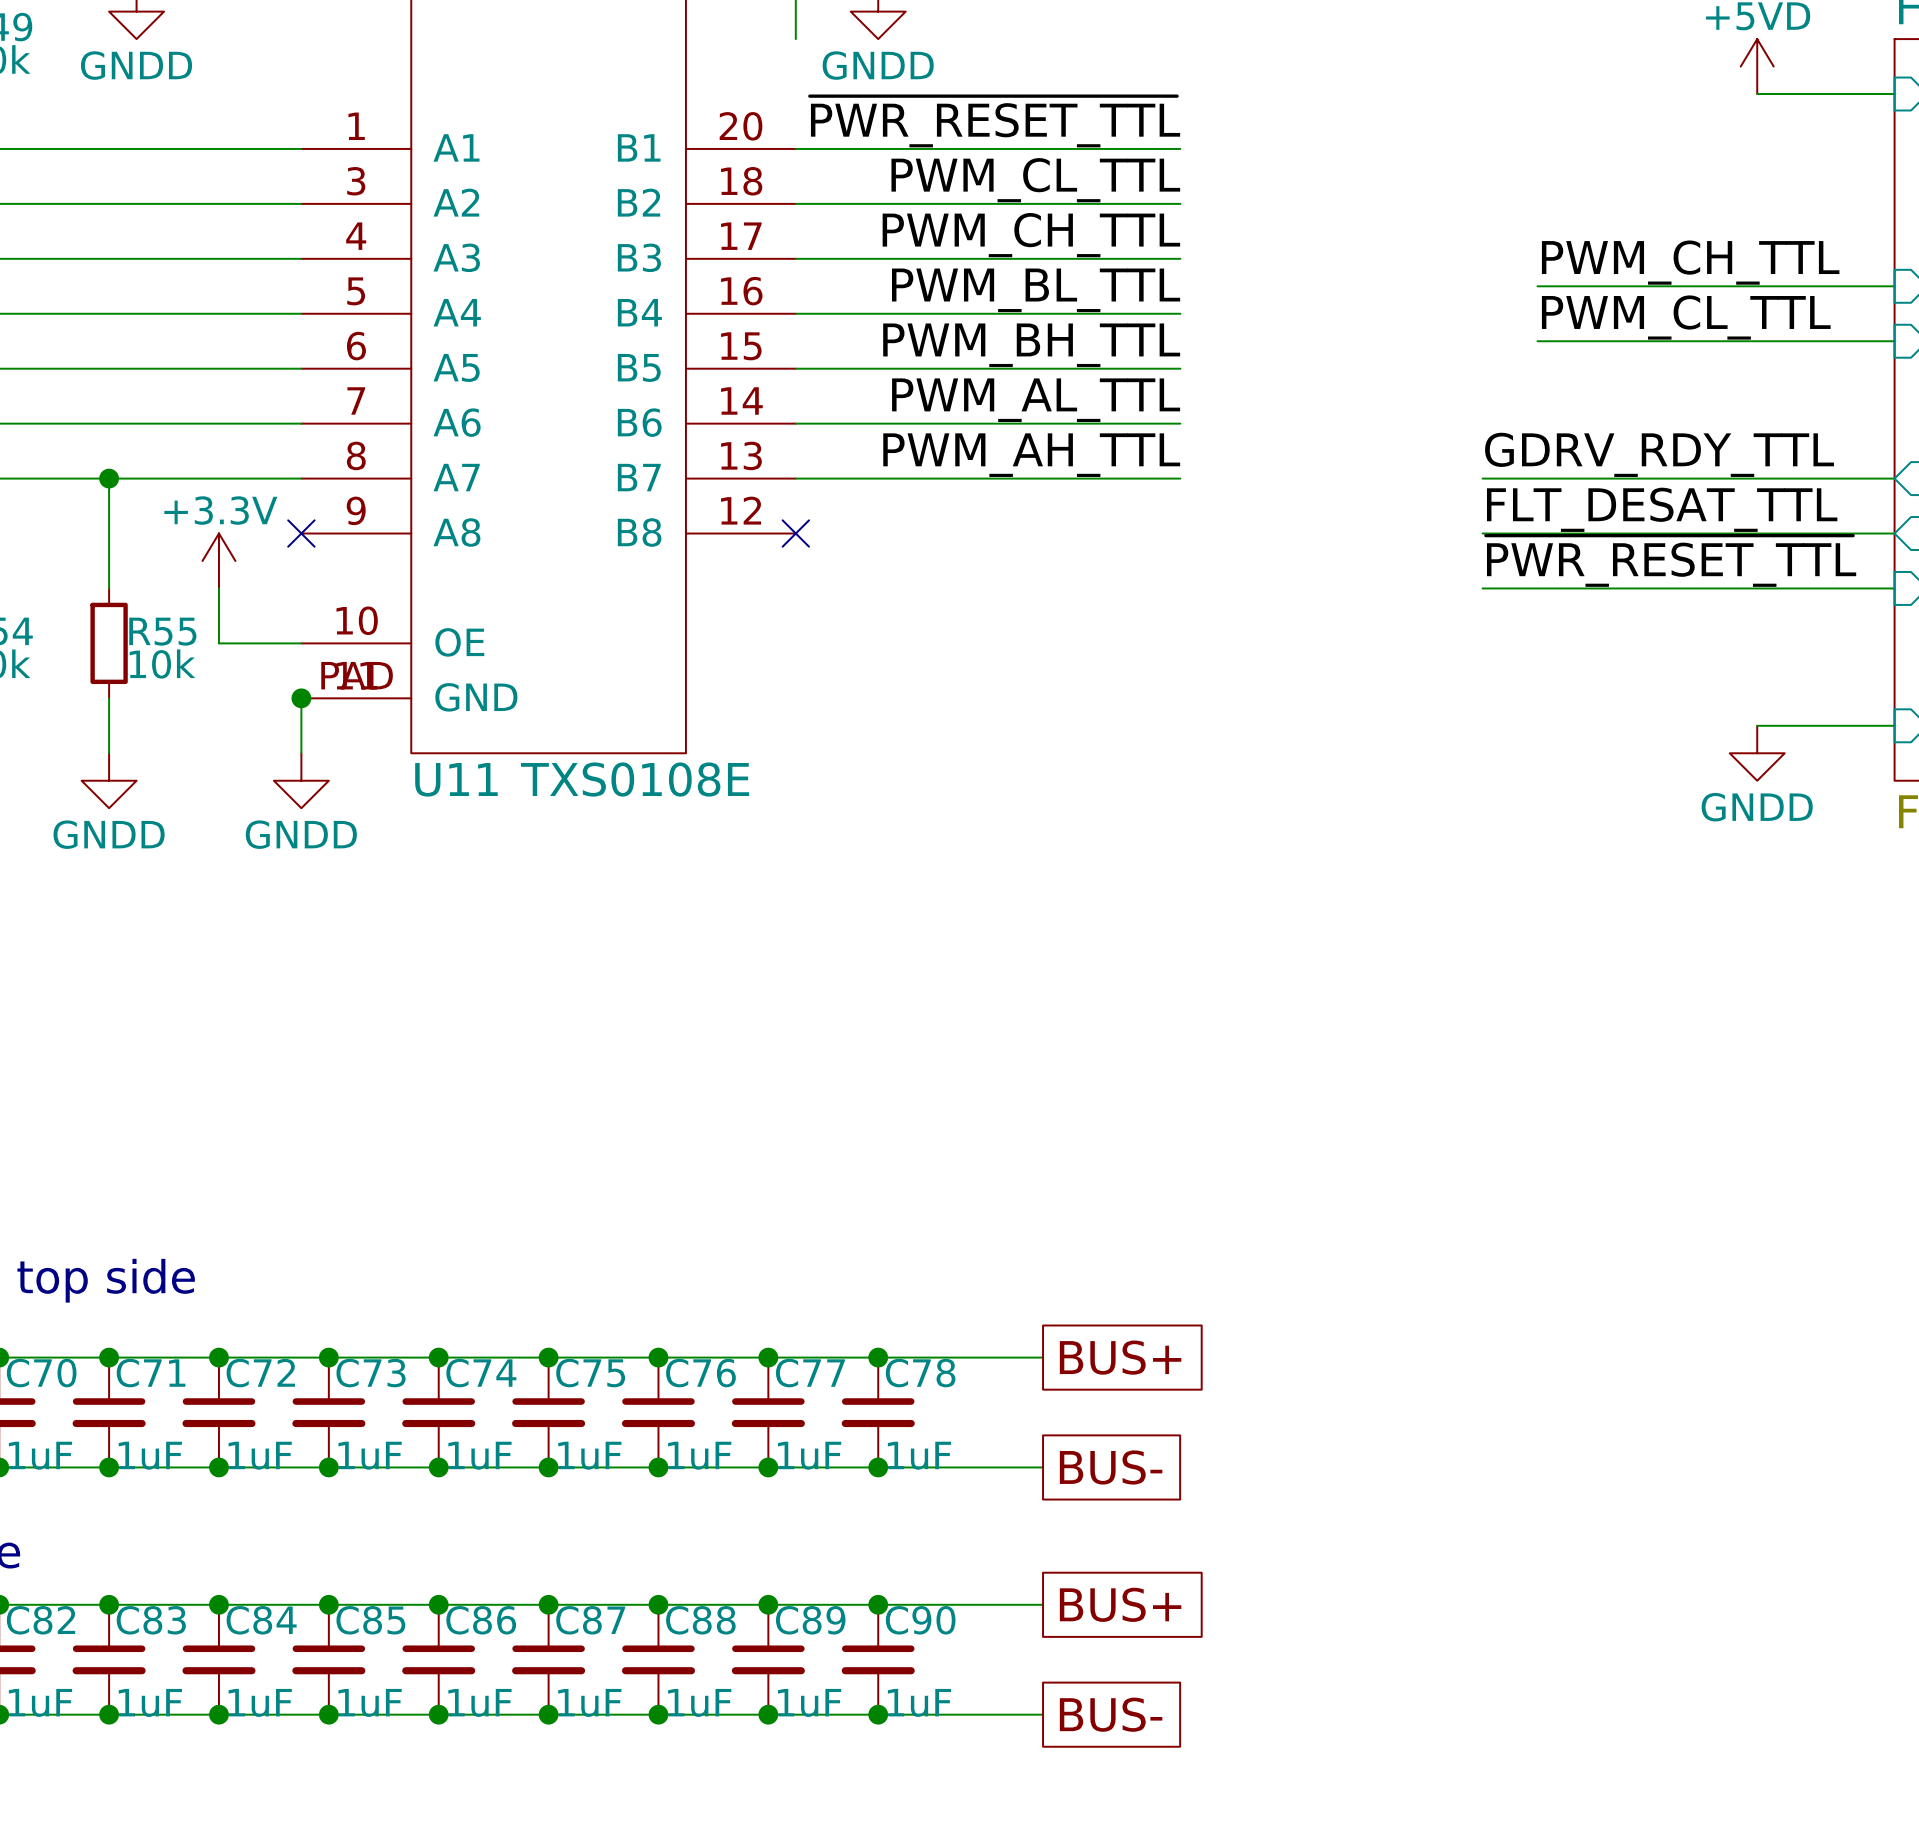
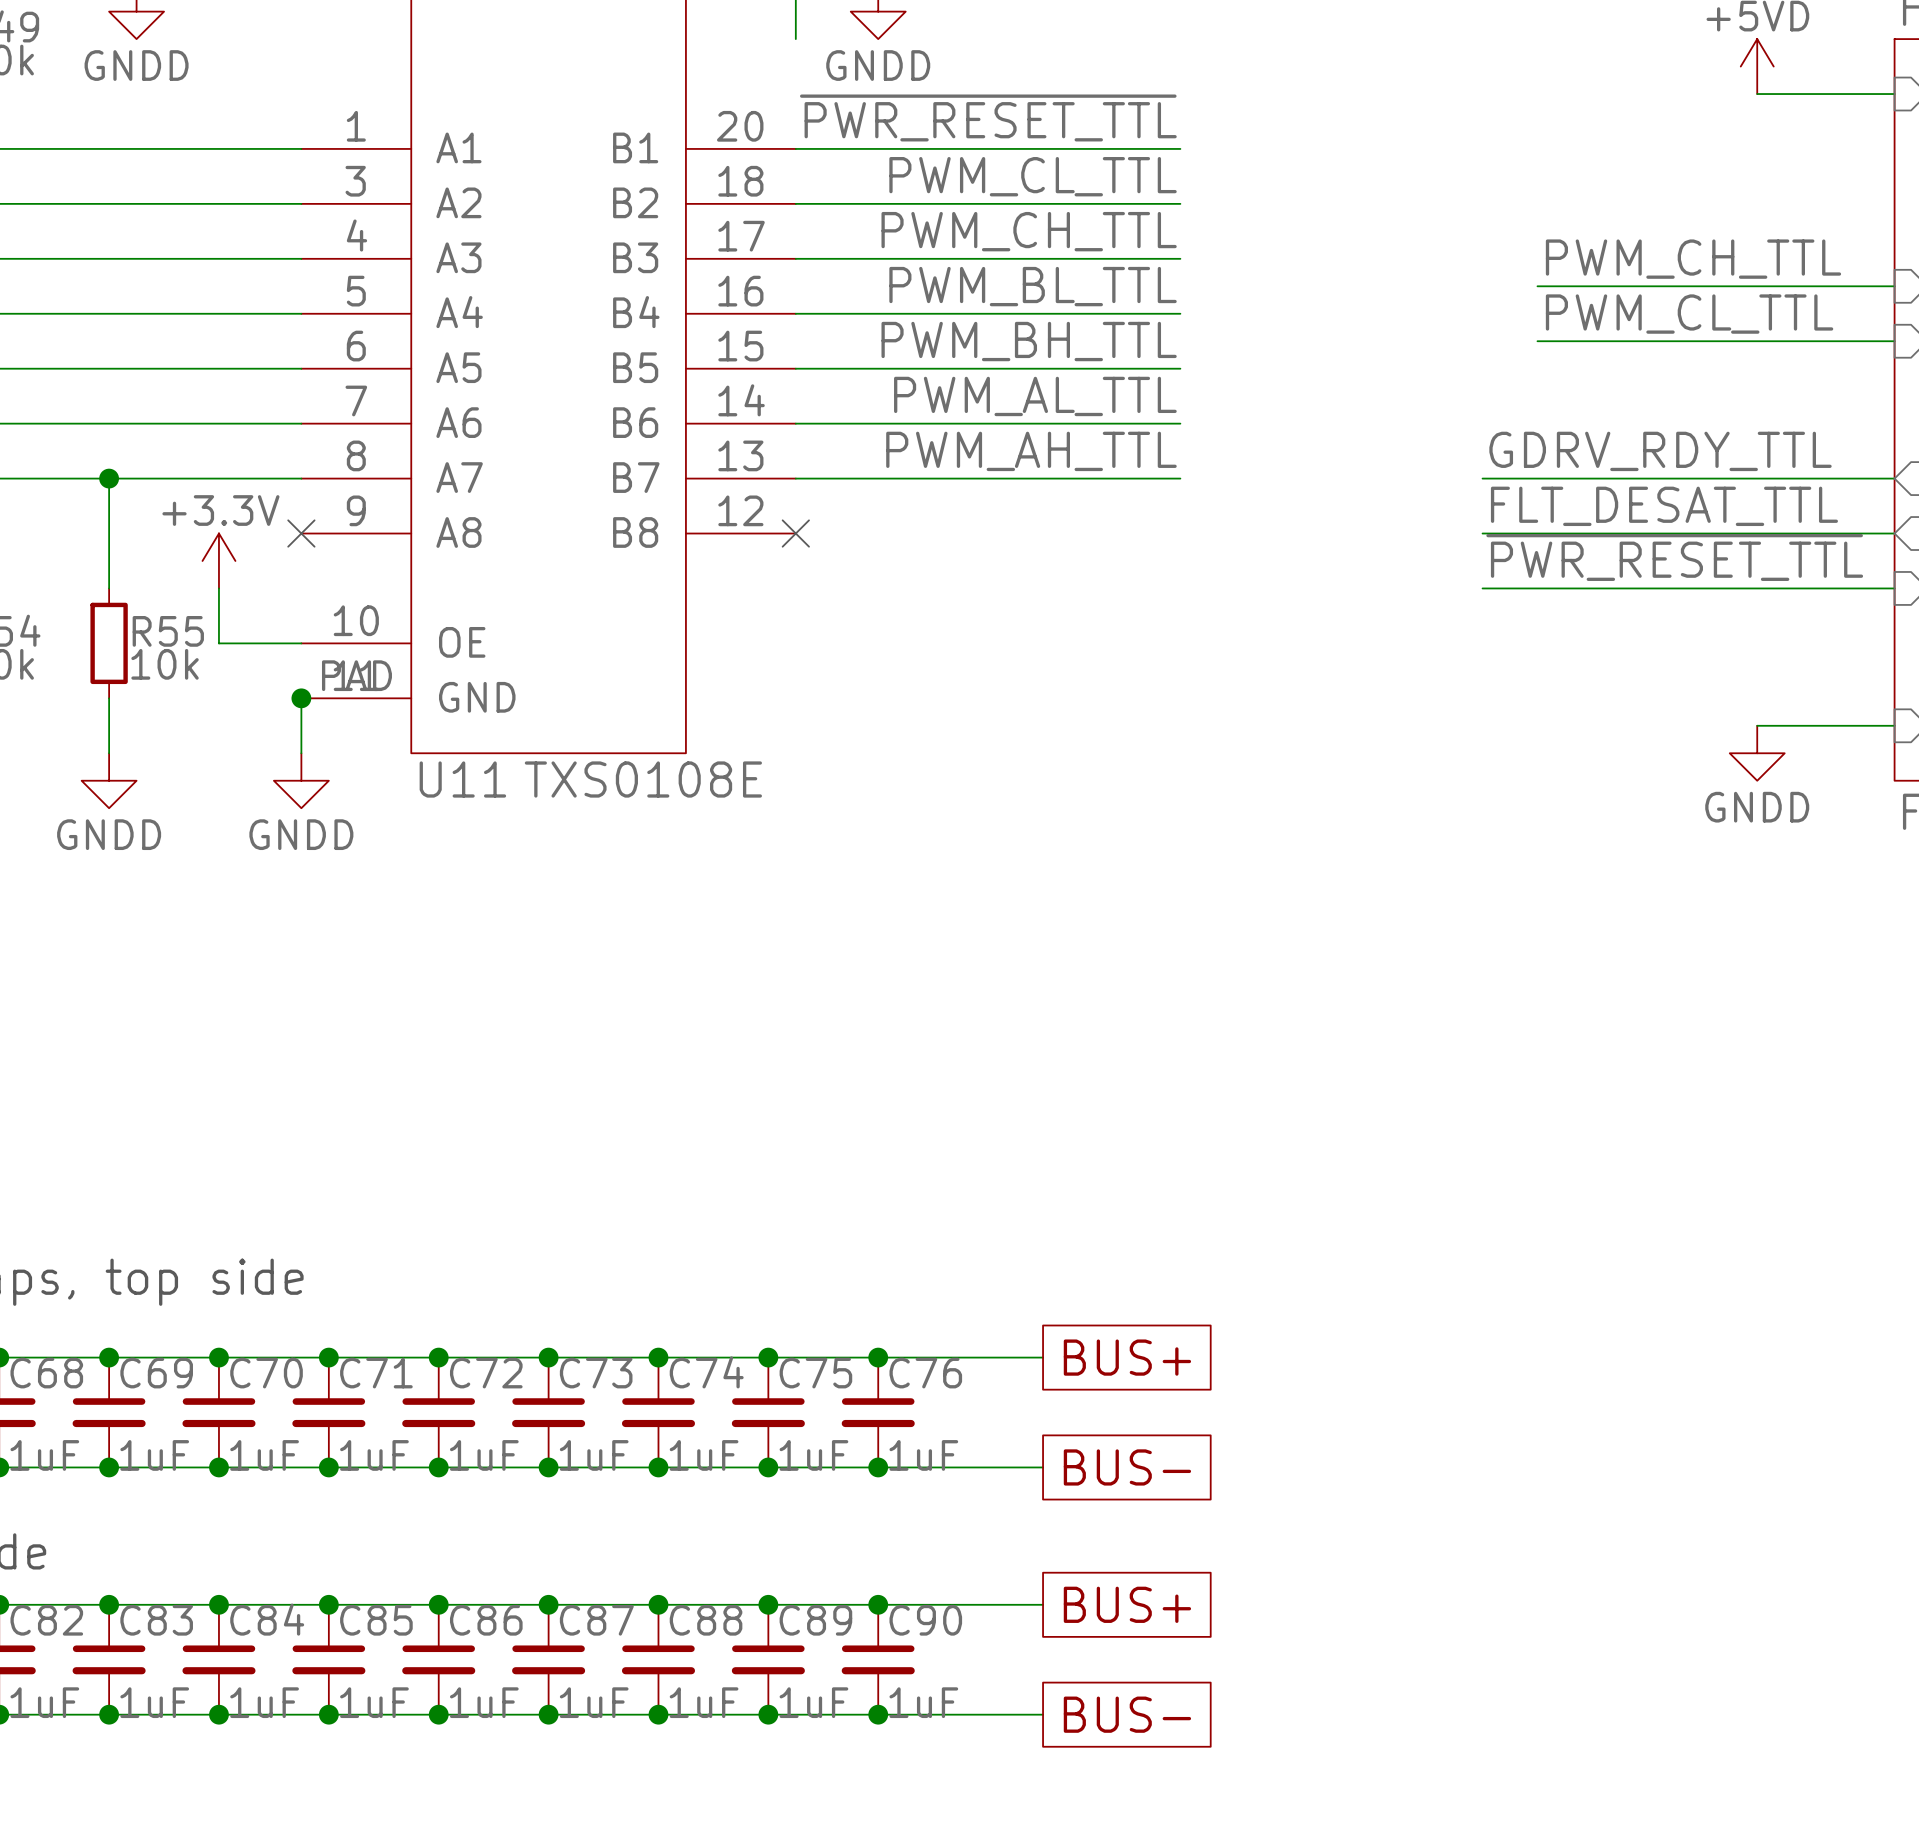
C70 name: C70 (41, 1373) -> C68 (46, 1373)
C71 name: C71 (151, 1373) -> C69 (156, 1373)
C72 name: C72 (260, 1373) -> C70 (266, 1373)
C73 name: C73 (371, 1373) -> C71 (376, 1373)
C74 name: C74 (481, 1373) -> C72 (486, 1373)
C75 name: C75 (590, 1373) -> C73 (596, 1373)
C76 name: C76 (700, 1373) -> C74 (706, 1372)
C77 name: C77 (810, 1373) -> C75 (815, 1373)
C78 name: C78 (920, 1373) -> C76 (925, 1373)

